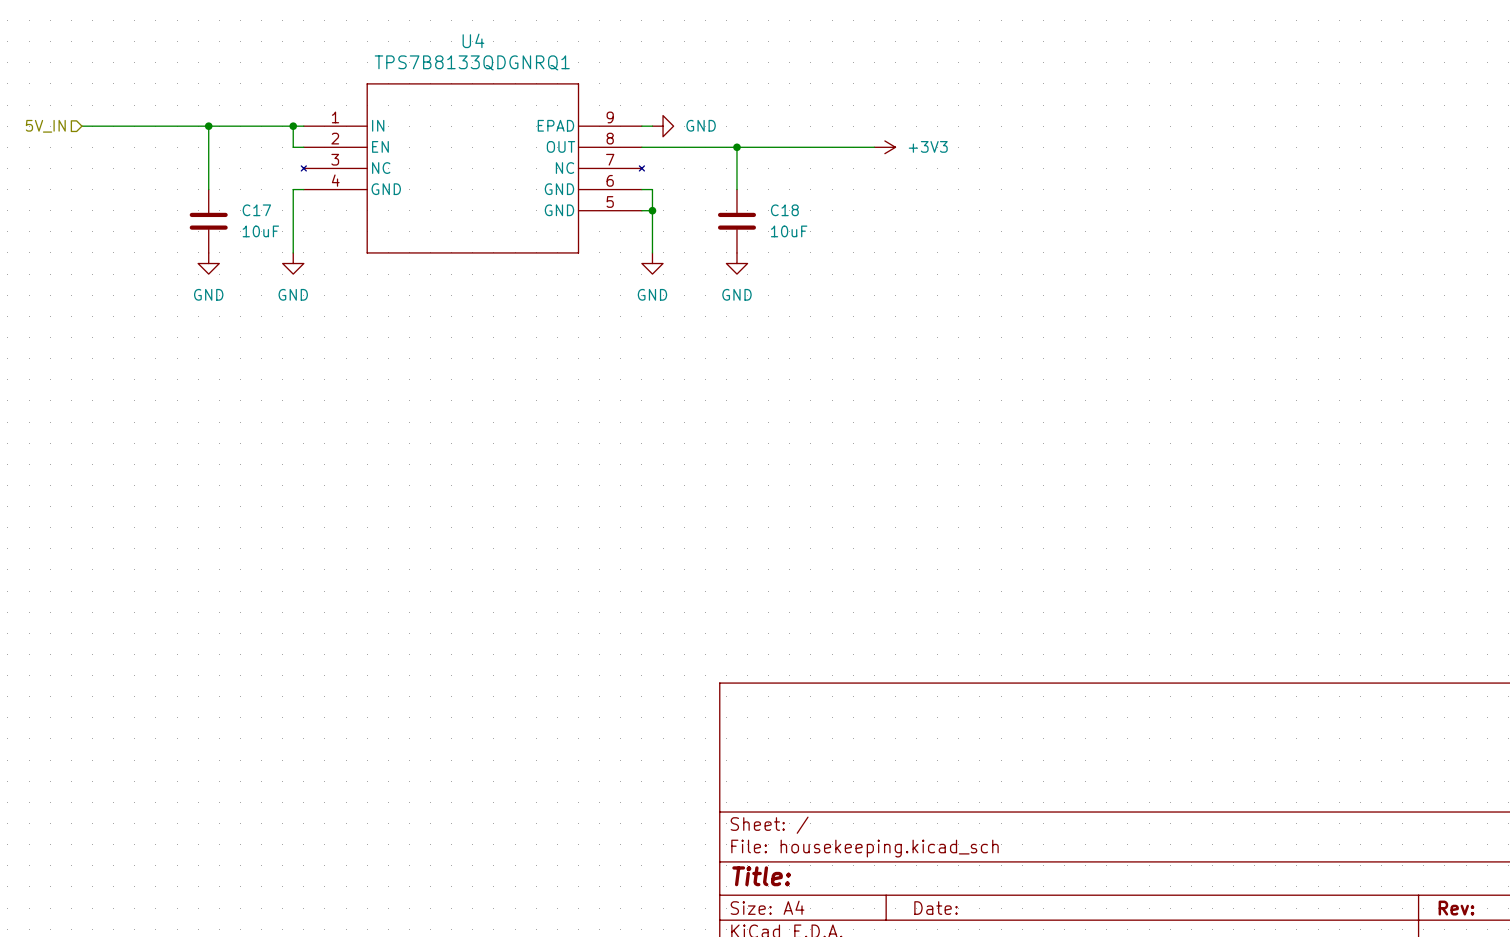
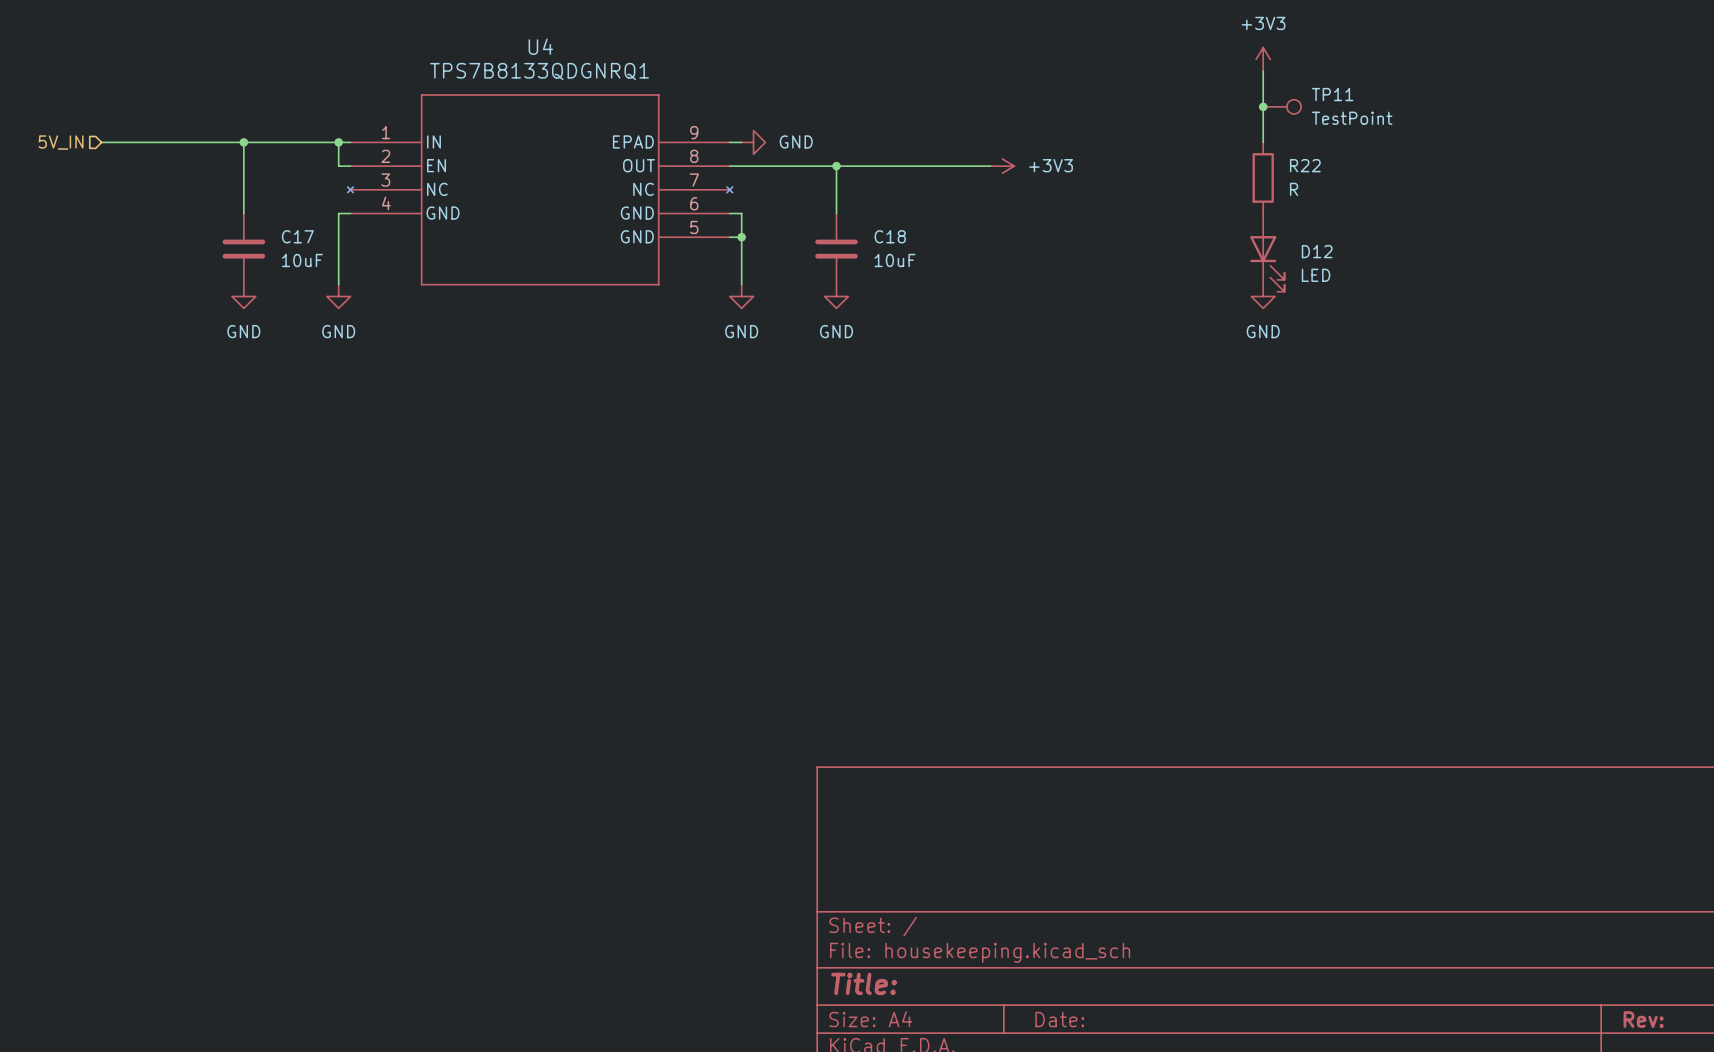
power symbol: none -> +3V3 (1263, 59)
wire: none -> (1263, 71) (1263, 142)
junction: none -> (1263, 106)
TP11: none -> TestPoint (1282, 106)
R22: none -> R (1263, 177)
D12: none -> LED (1267, 252)
power symbol: none -> GND (1263, 296)

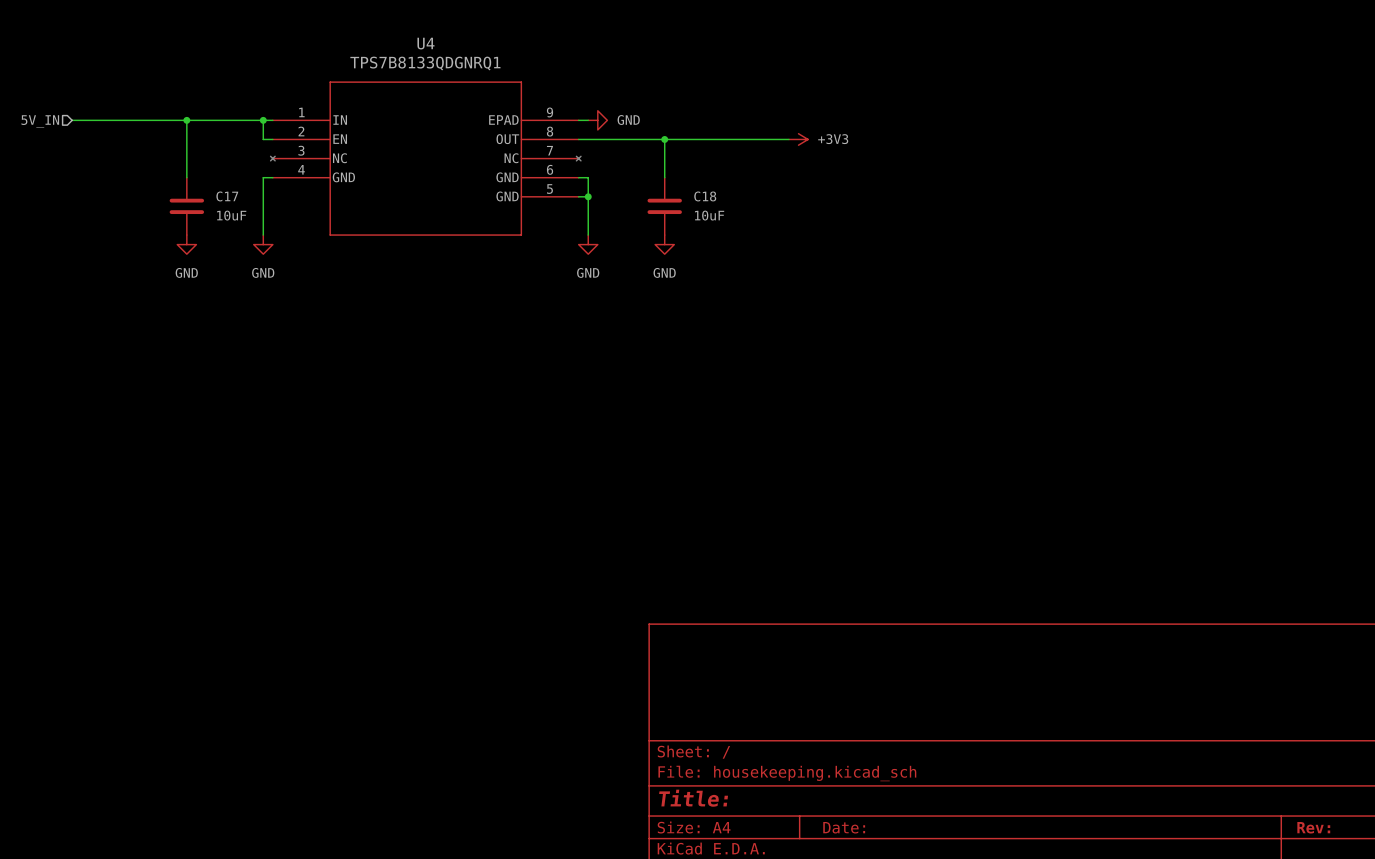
power symbol: +3V3 (1263, 59) -> none
wire: (1263, 71) (1263, 142) -> none
junction: (1263, 106) -> none
TP11: TestPoint (1282, 106) -> none
R22: R (1263, 177) -> none
D12: LED (1267, 252) -> none
power symbol: GND (1263, 296) -> none

